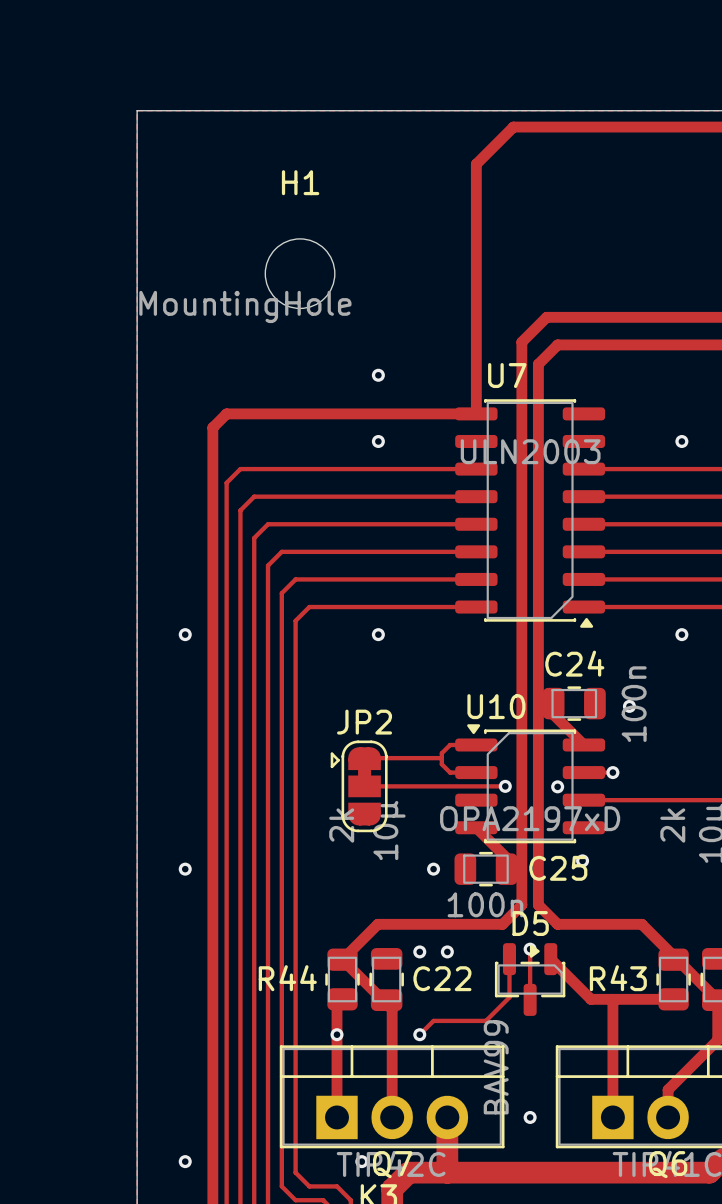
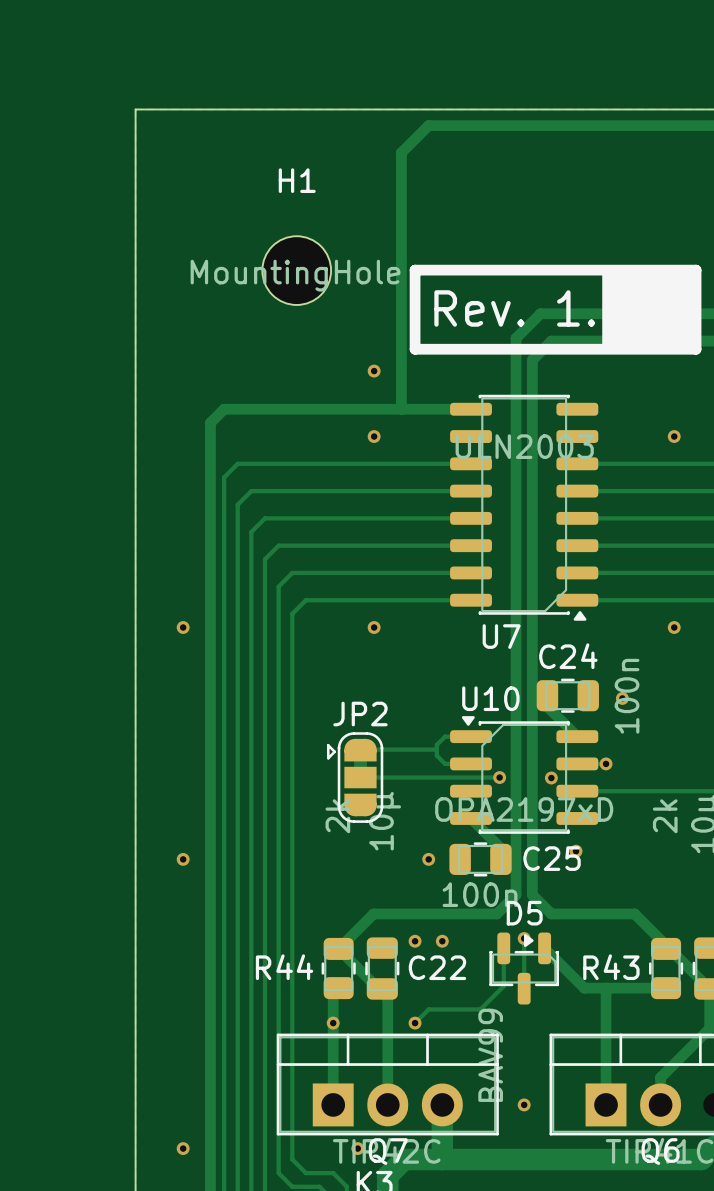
track: (513, 127) (476, 164) (476, 413) -> (507, 125) (428, 125) (401, 152) (401, 409)
drawing: none -> [602, 266, 700, 354]
line: none -> (415, 270) (696, 270) (696, 349) (415, 349) (415, 270)
H1 value position: MountingHole (245, 306) -> MountingHole (295, 275)
text: none -> Rev. 1. (514, 308)
U7 name position: U7 (507, 375) -> U7 (501, 636)

